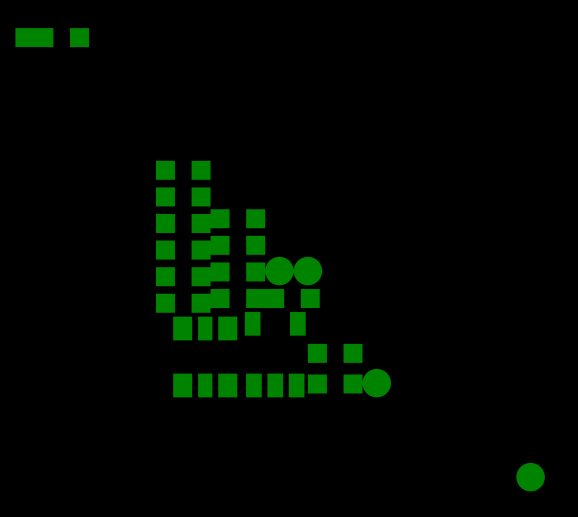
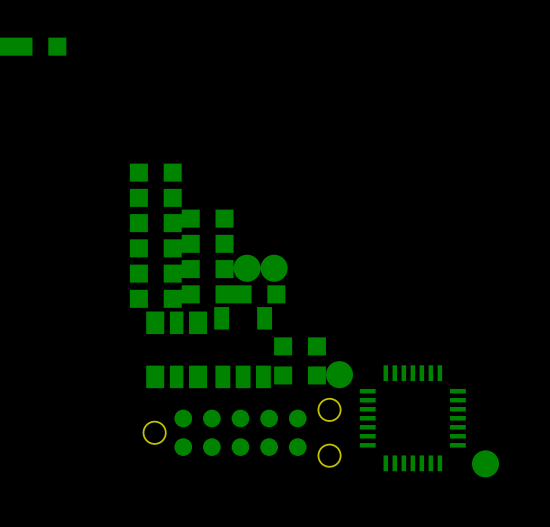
part: none -> (412, 418)
part: none -> (242, 432)

